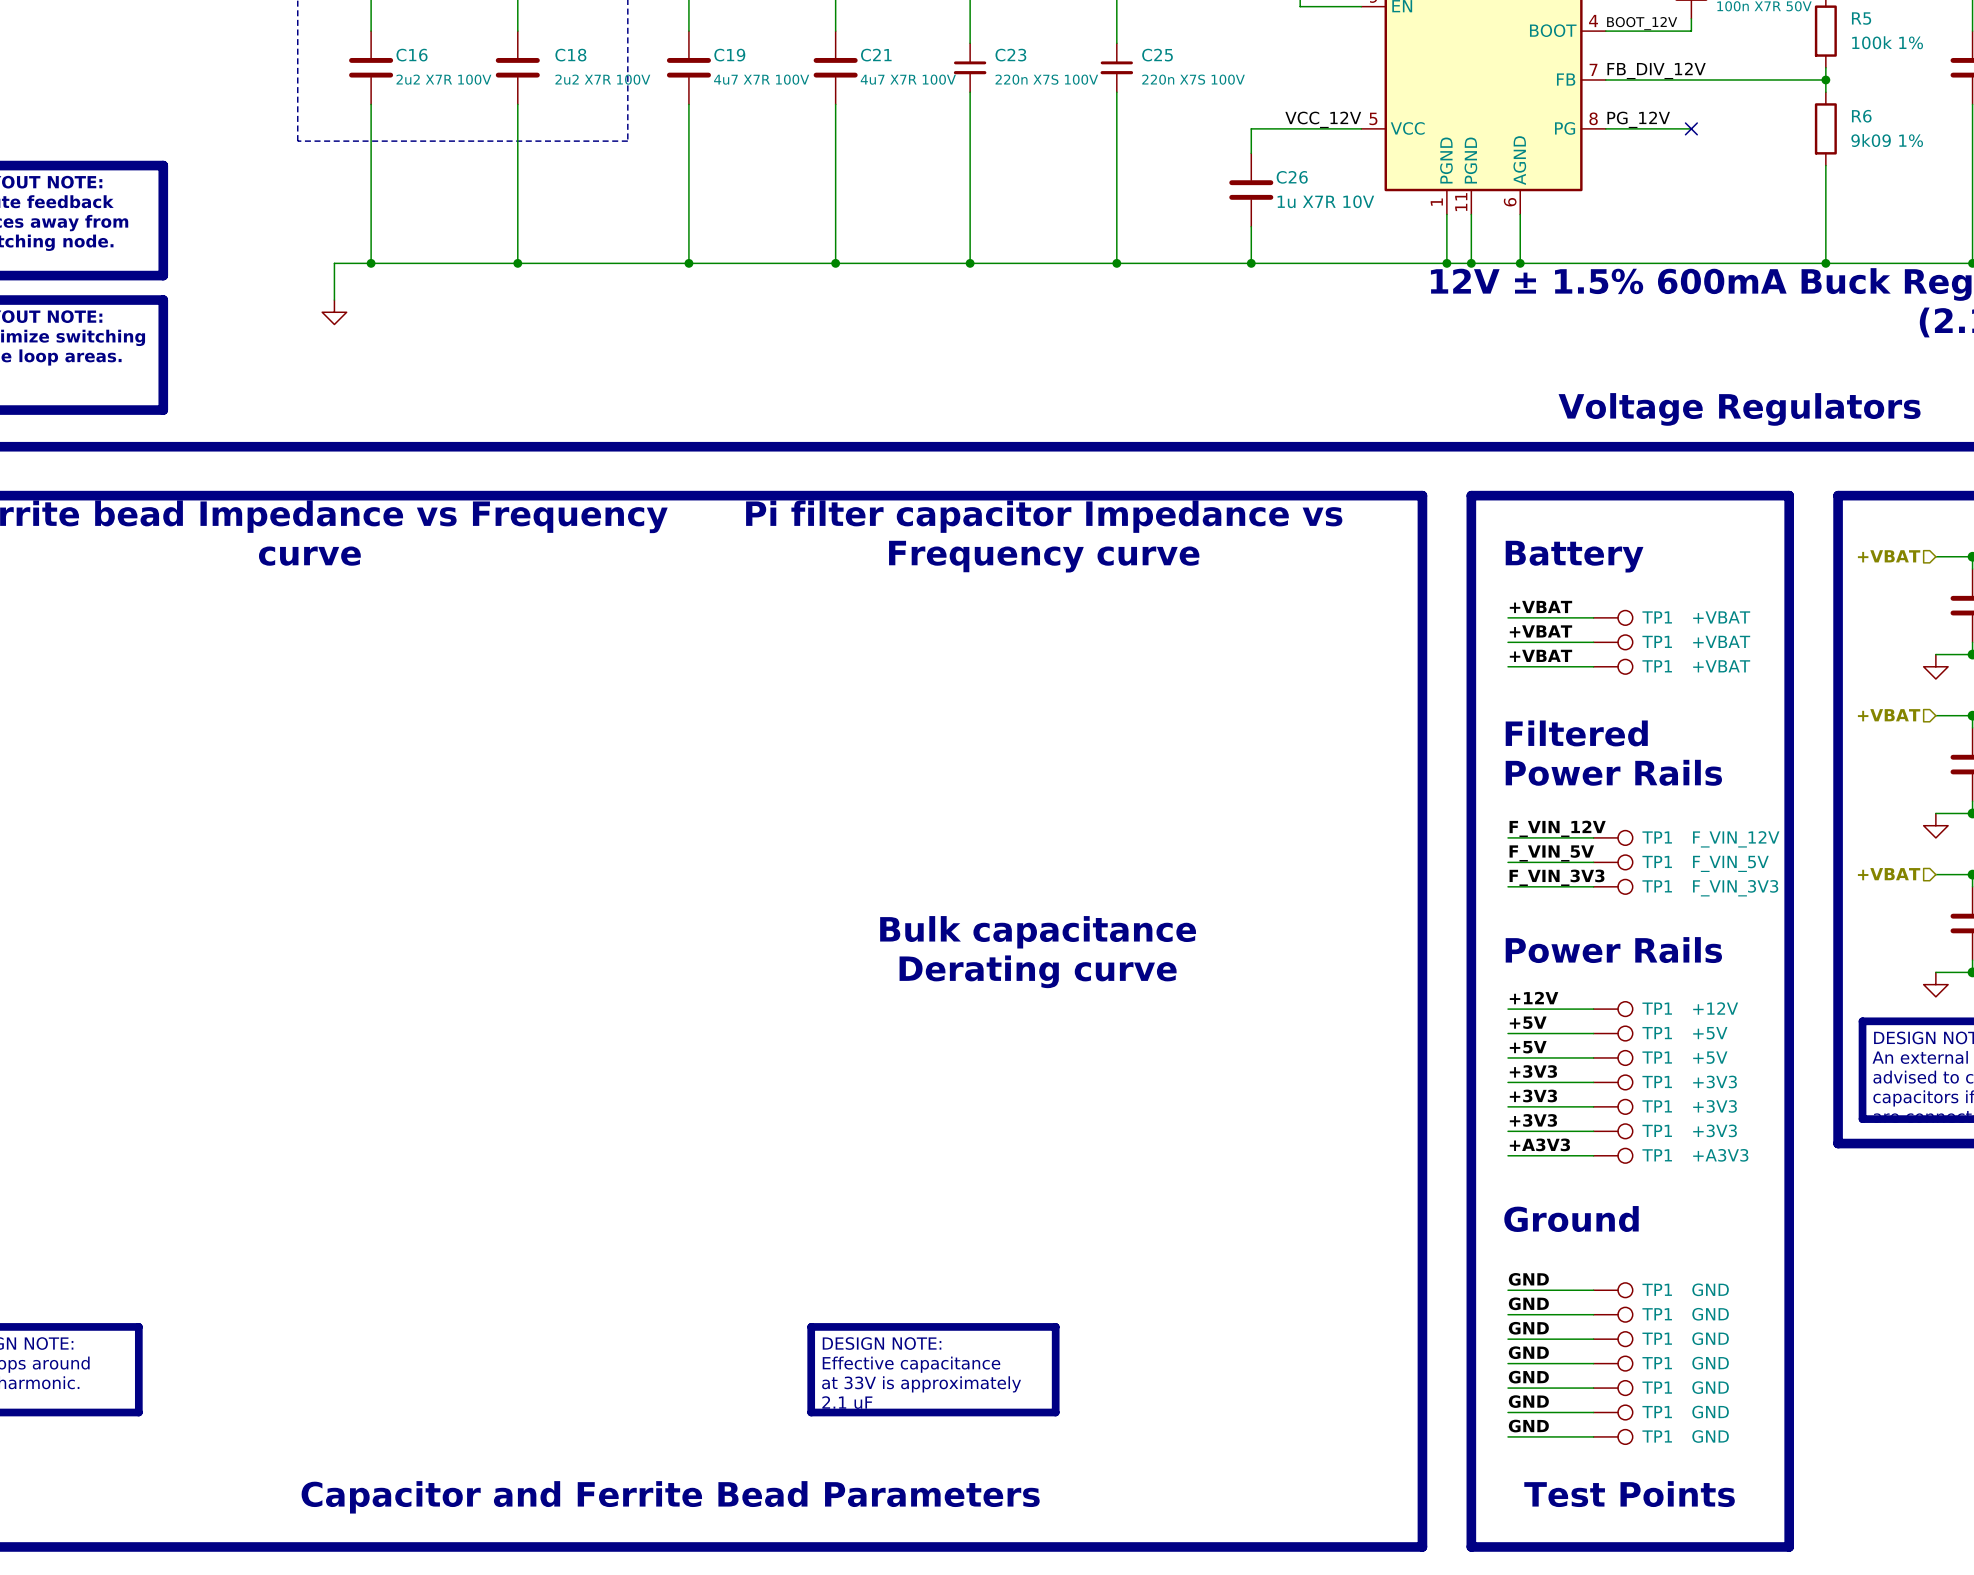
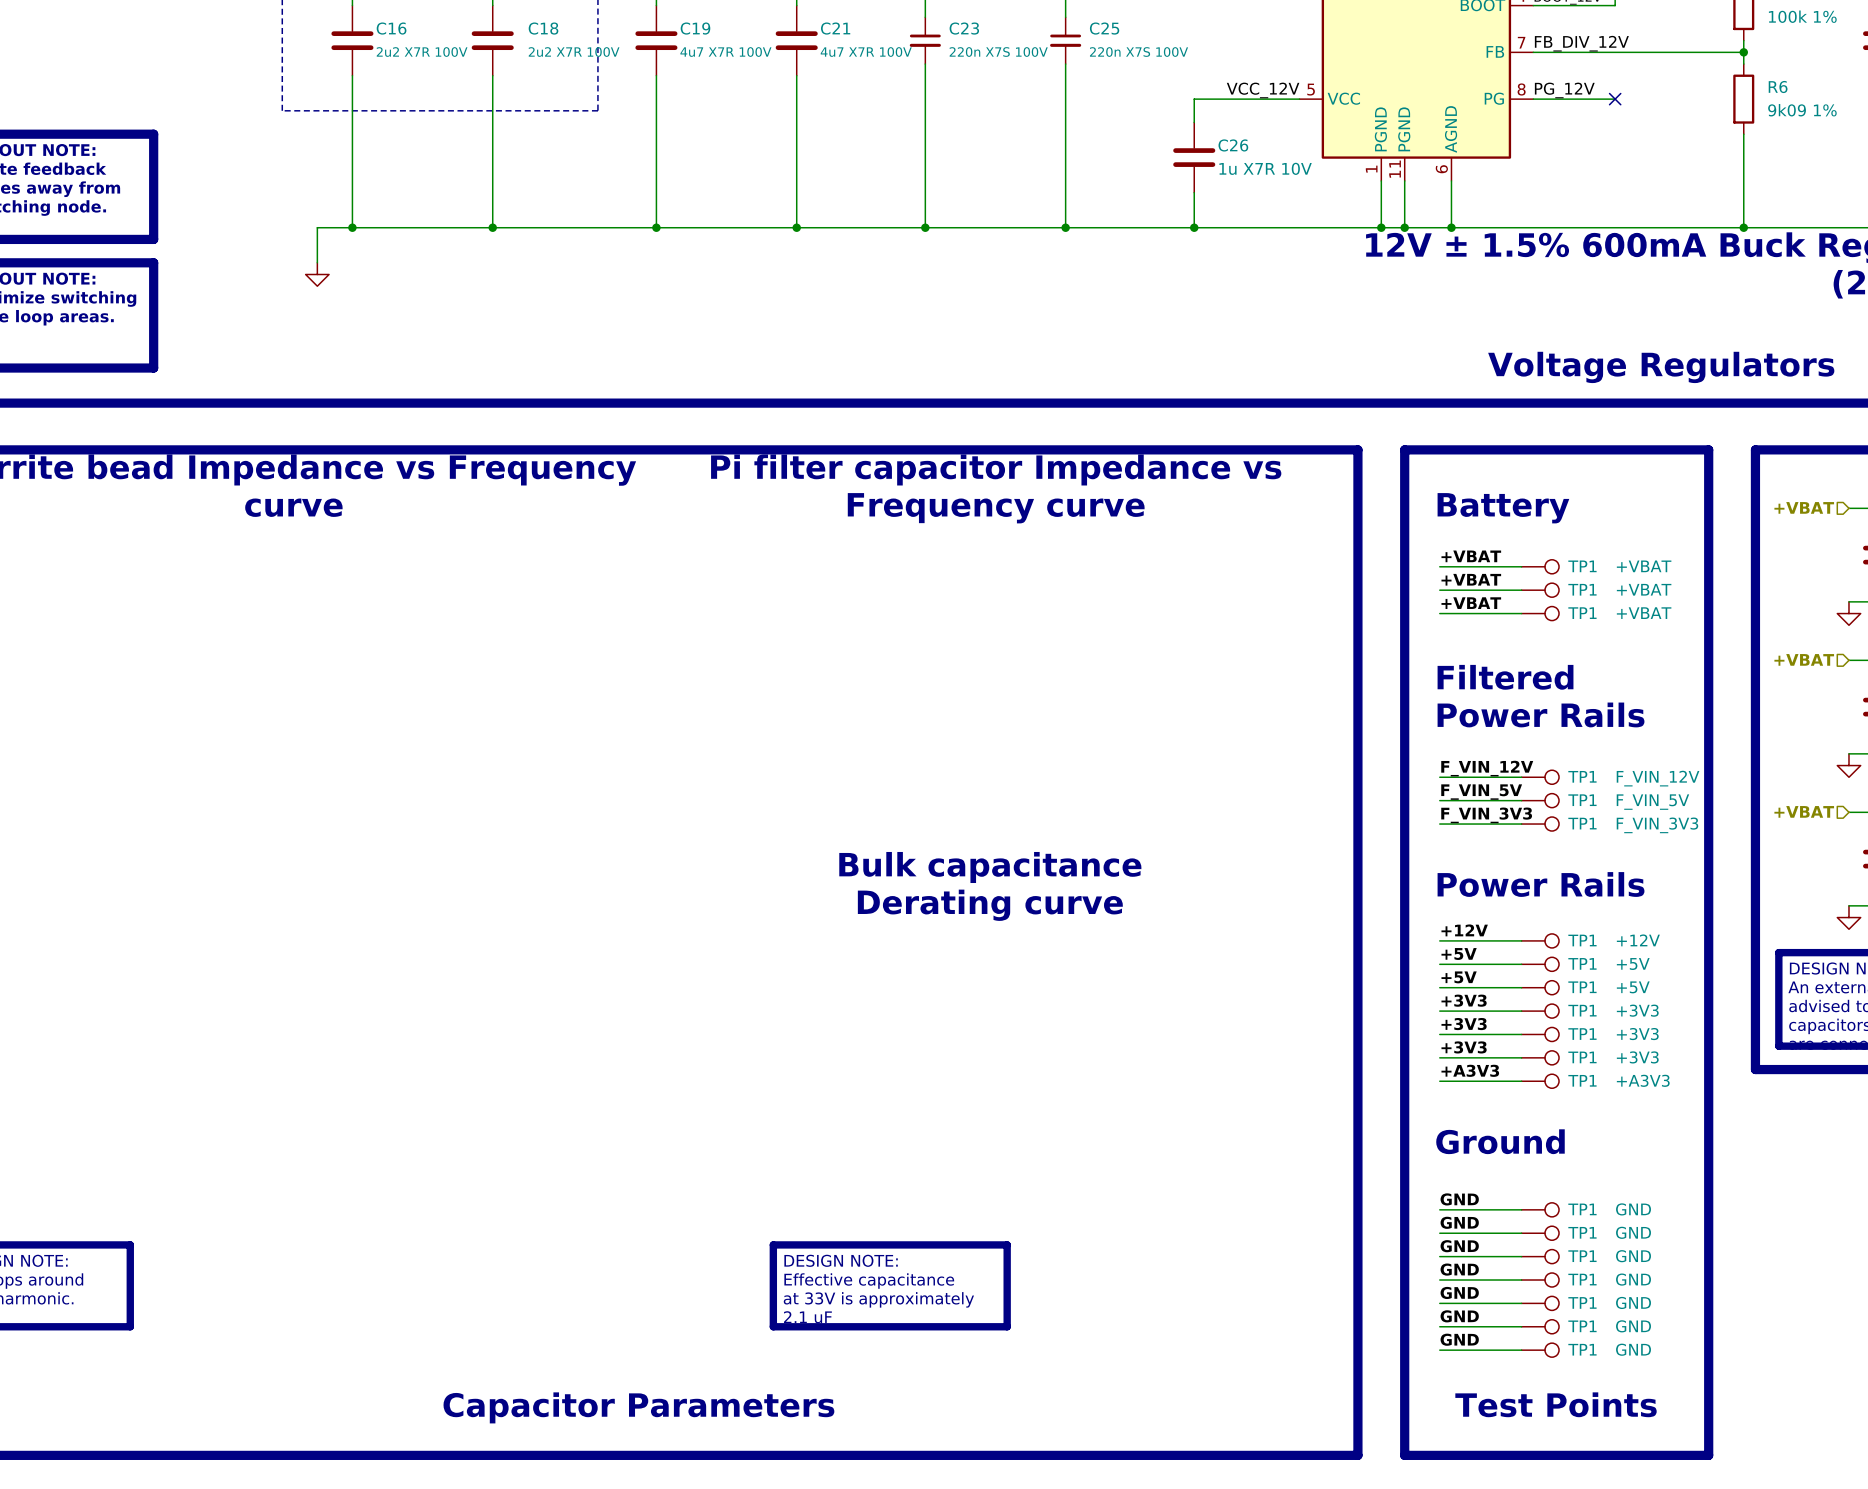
text: Capacitor and Ferrite Bead Parameters (670, 1497) -> Capacitor Parameters (638, 1407)

